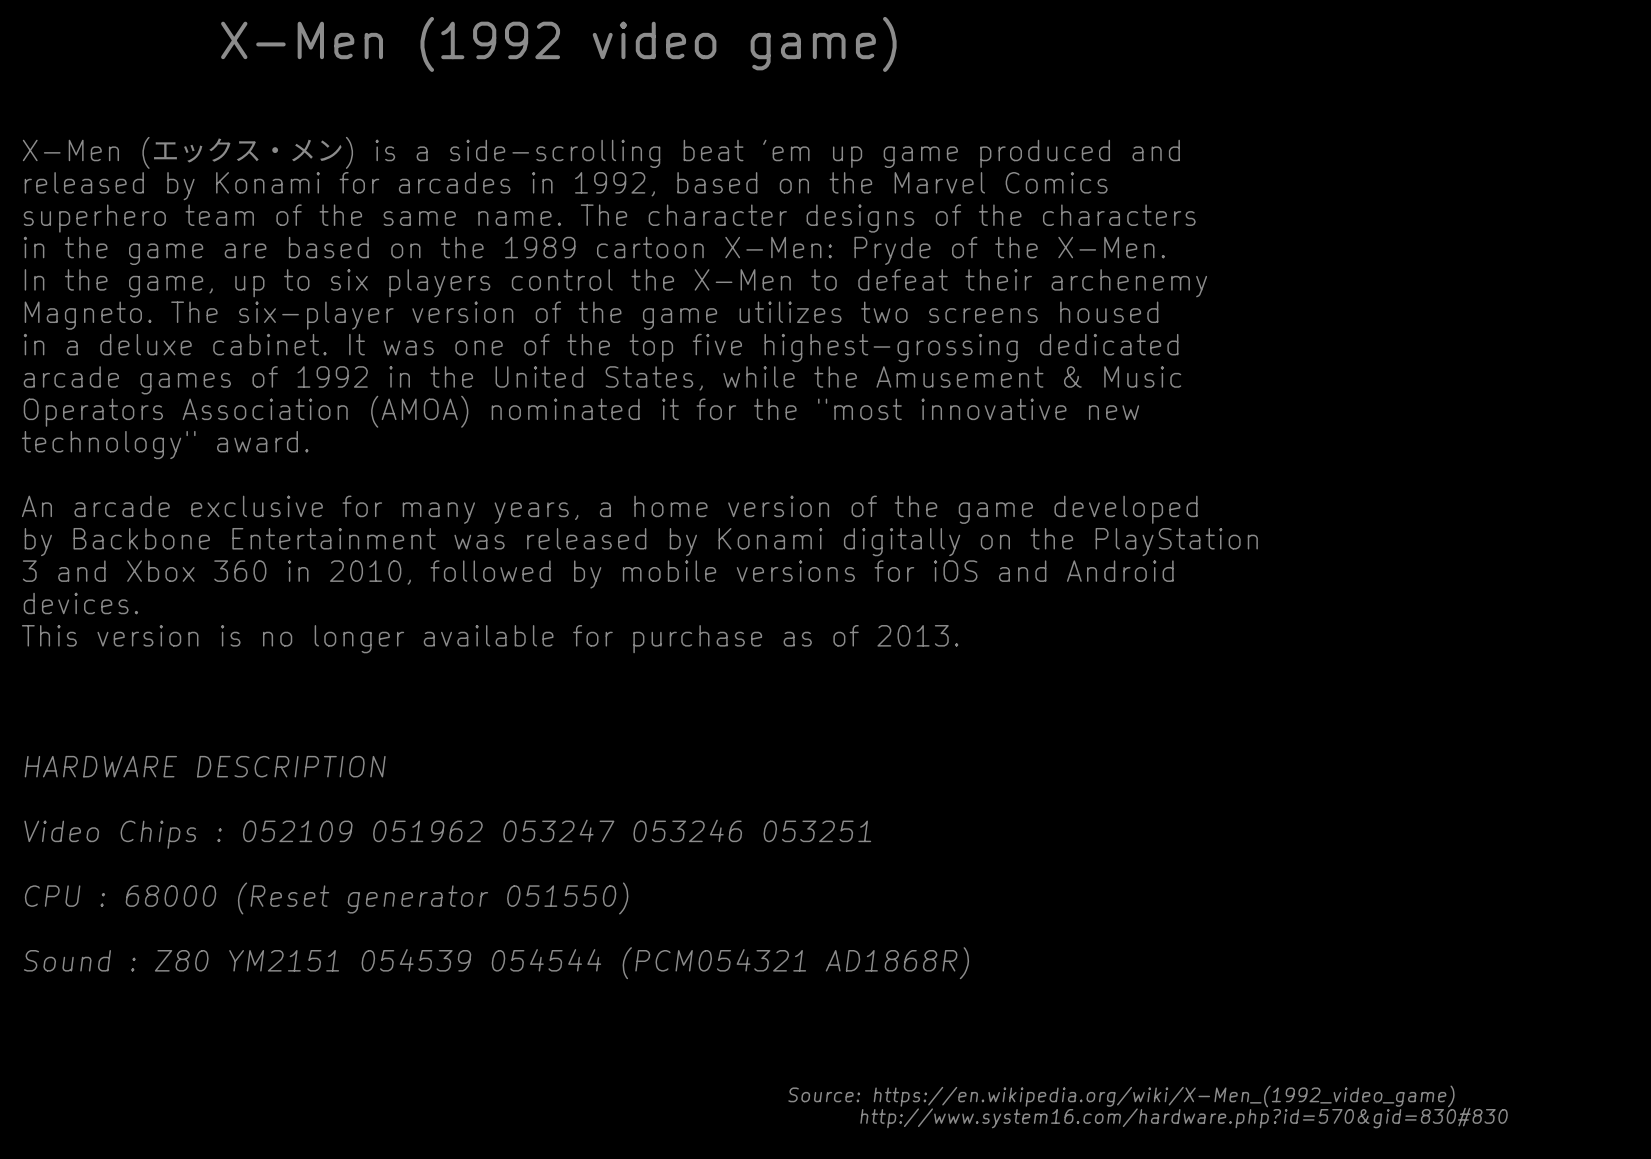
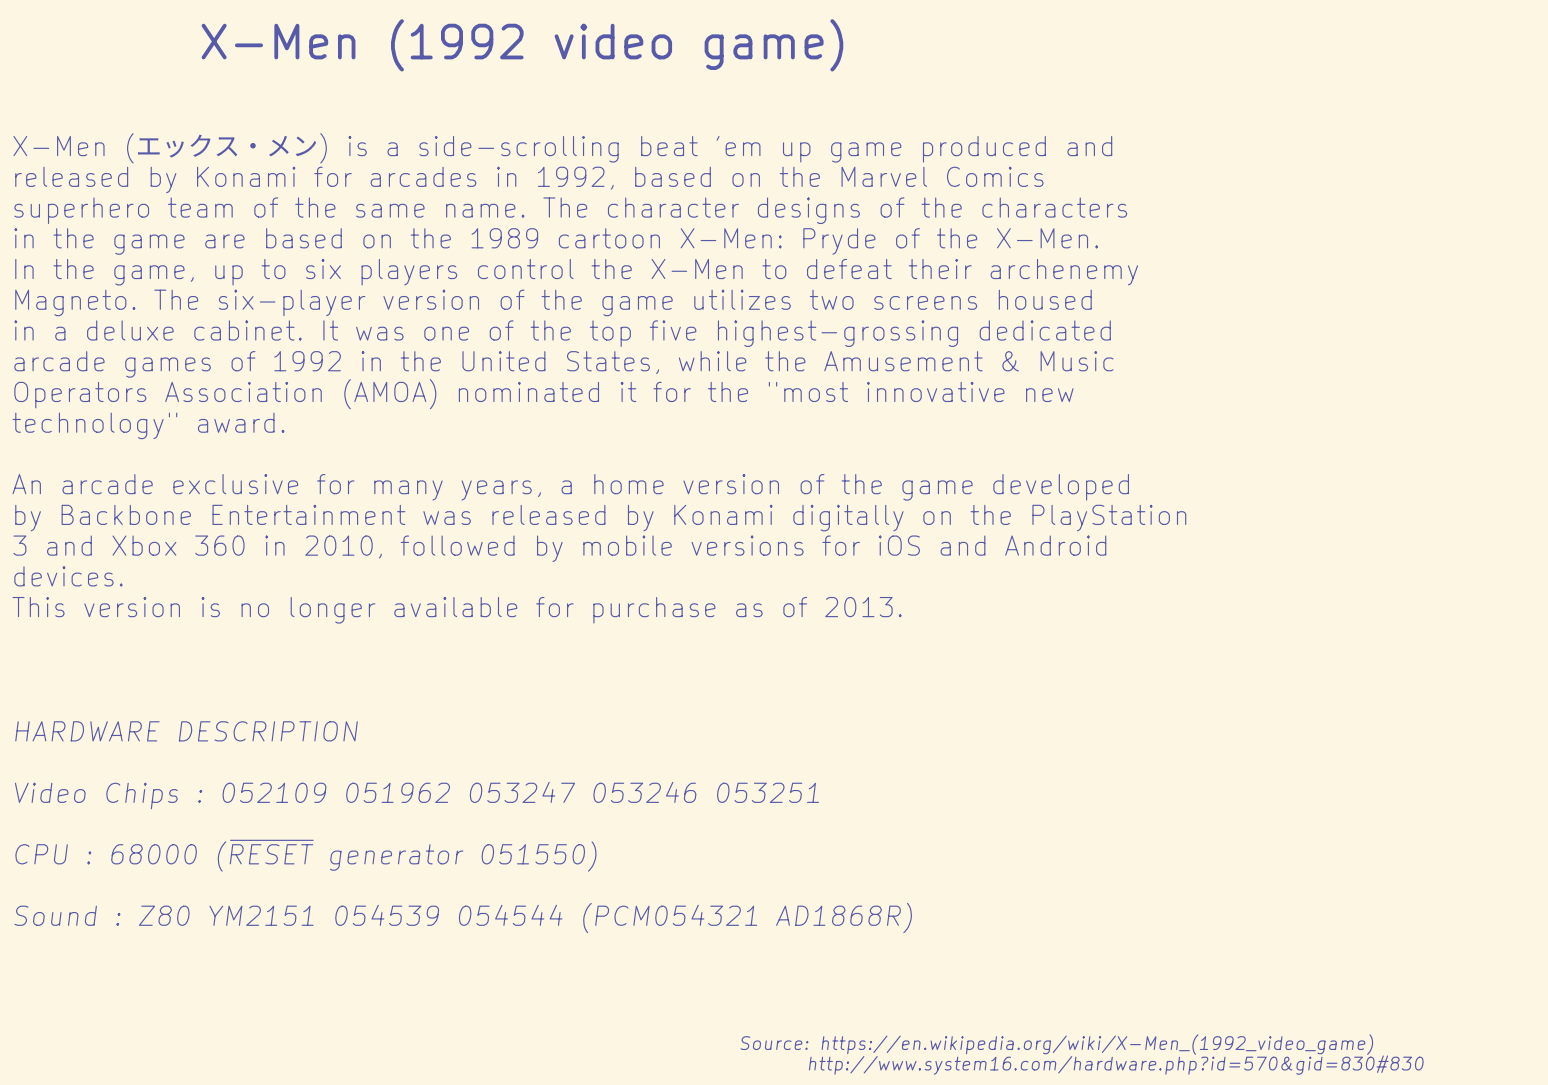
text: CPU : 68000 (Reset generator 051550) (326, 898) -> CPU : 68000 (~{RESET} generator 051550) (305, 855)

